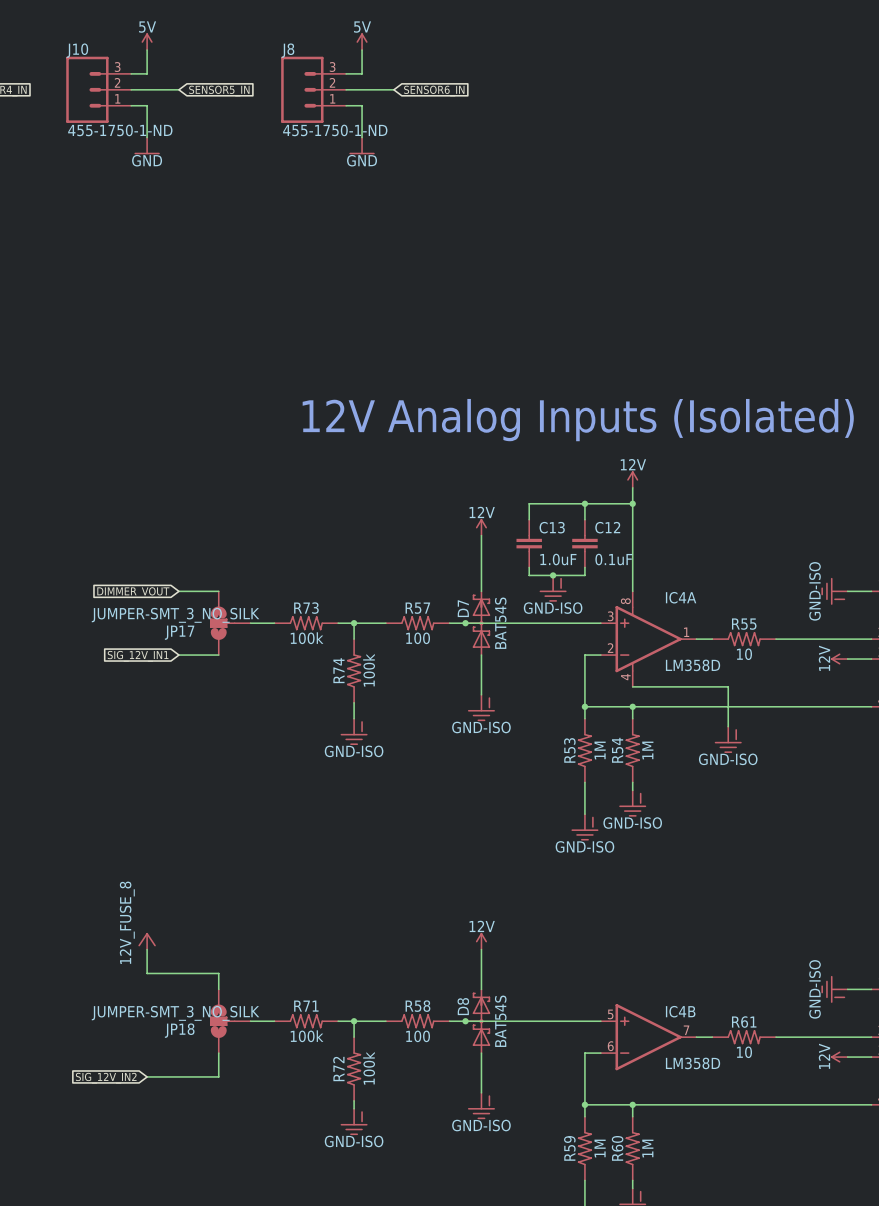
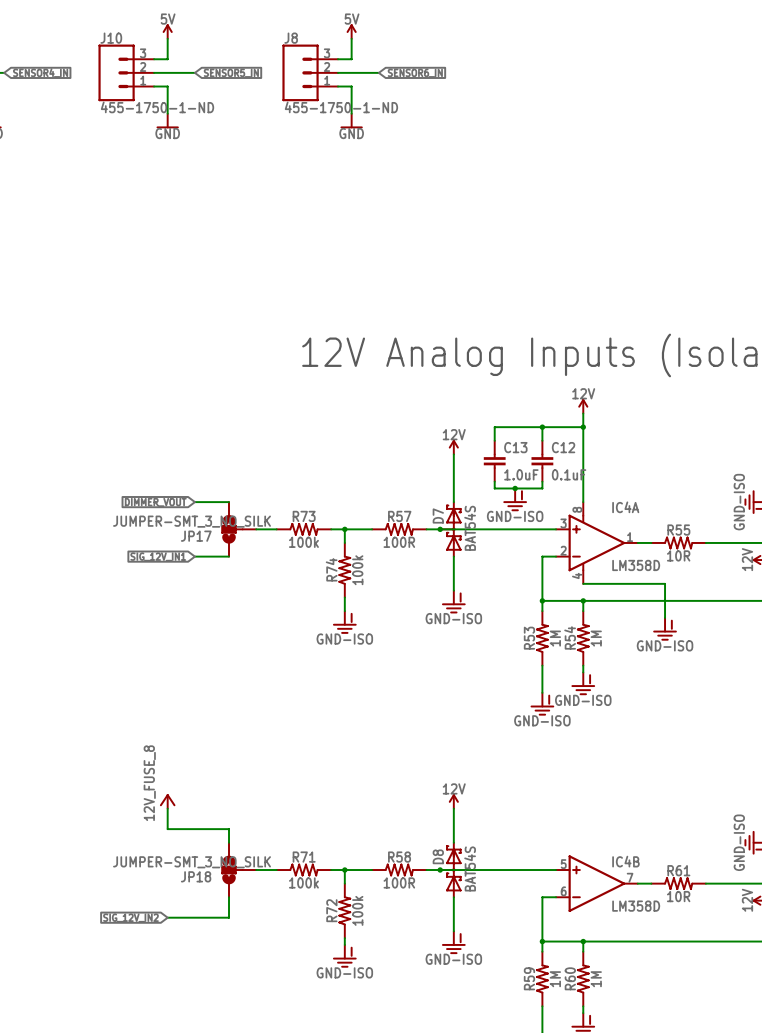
R57 value: 100 (418, 638) -> 100R (399, 542)
R55 value: 10 (744, 654) -> 10R (678, 555)
R58 value: 100 (418, 1036) -> 100R (399, 882)
R61 value: 10 (744, 1052) -> 10R (678, 896)

